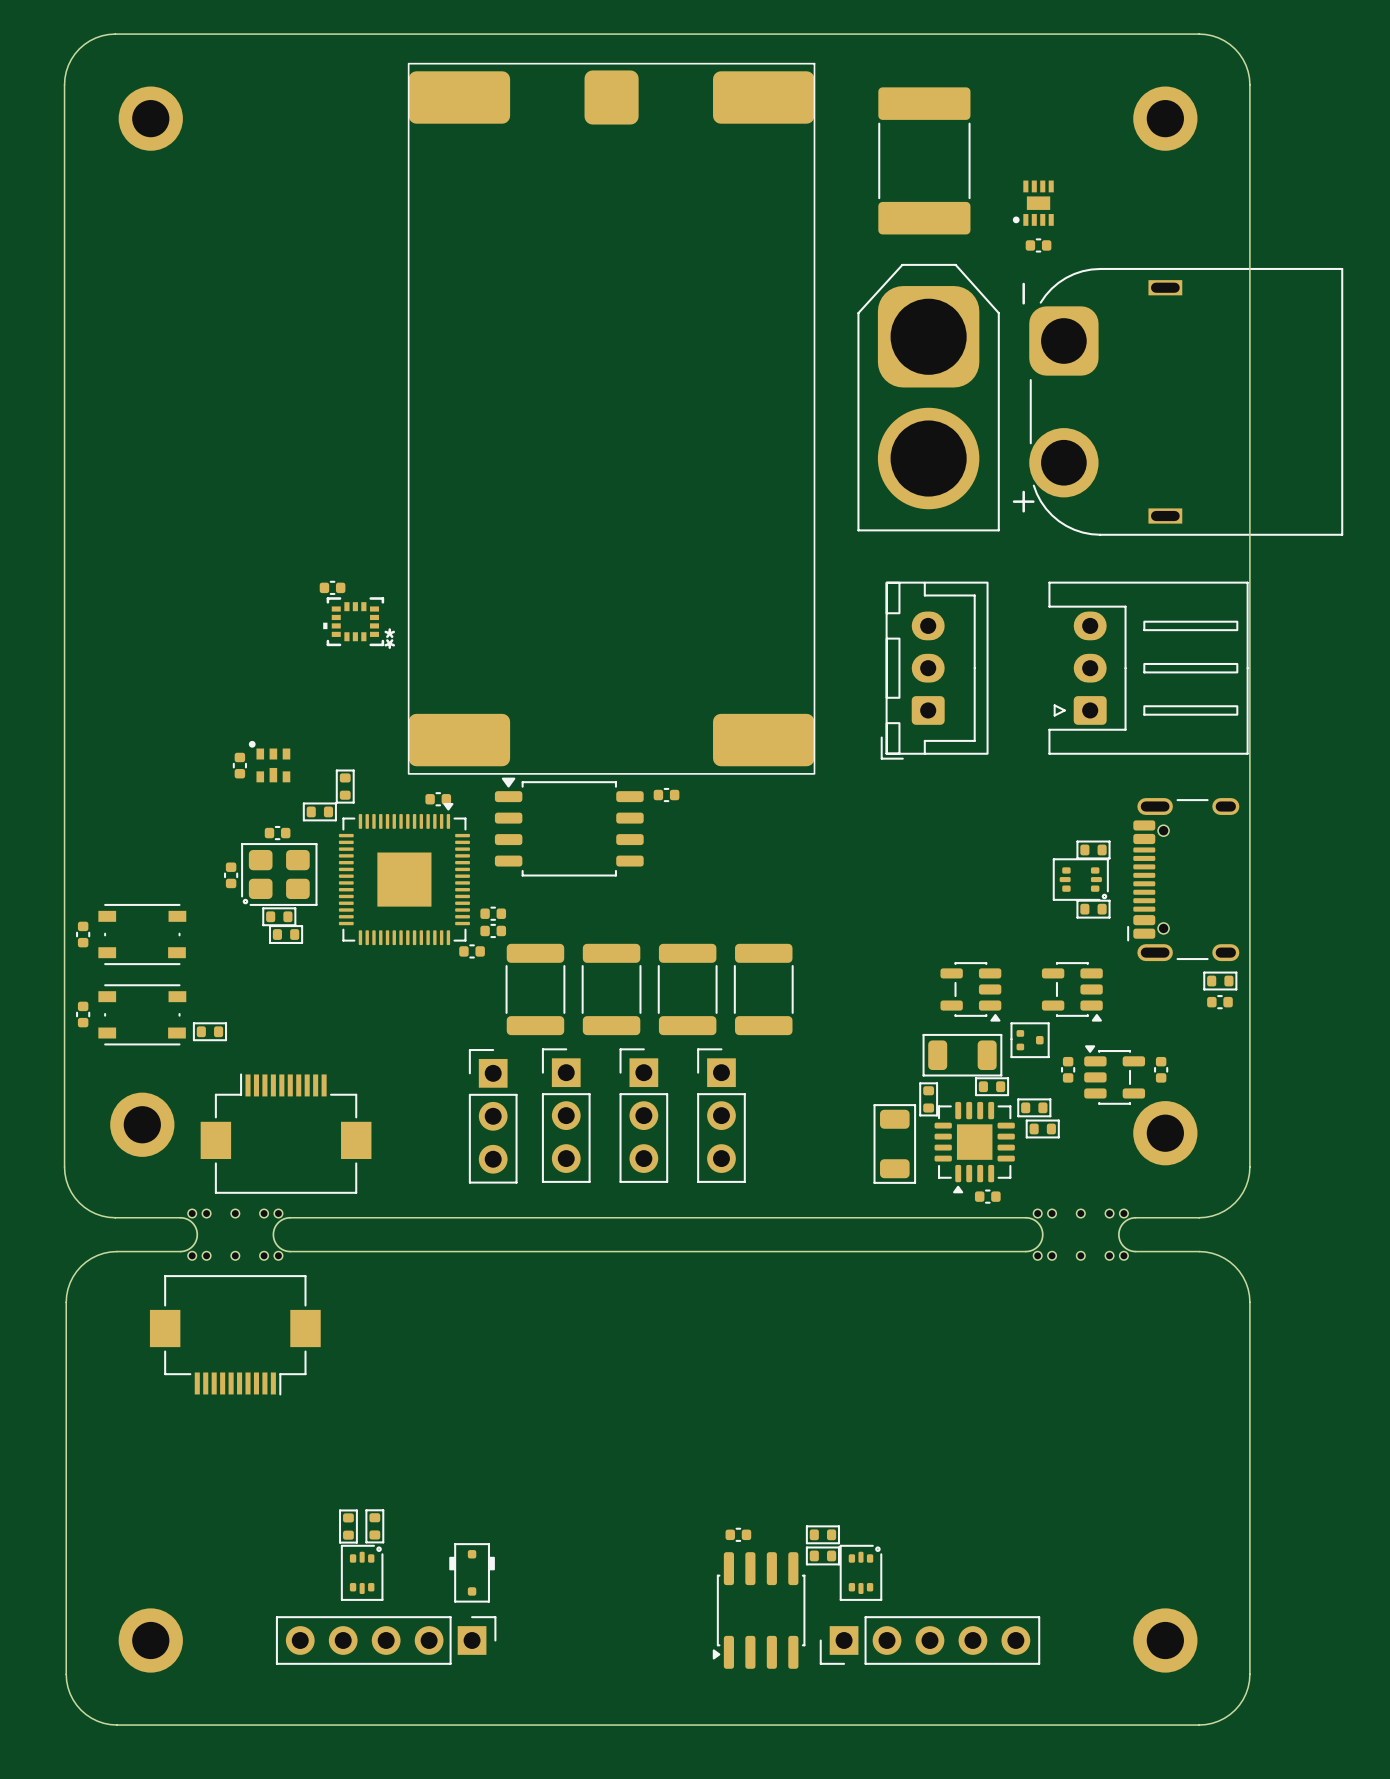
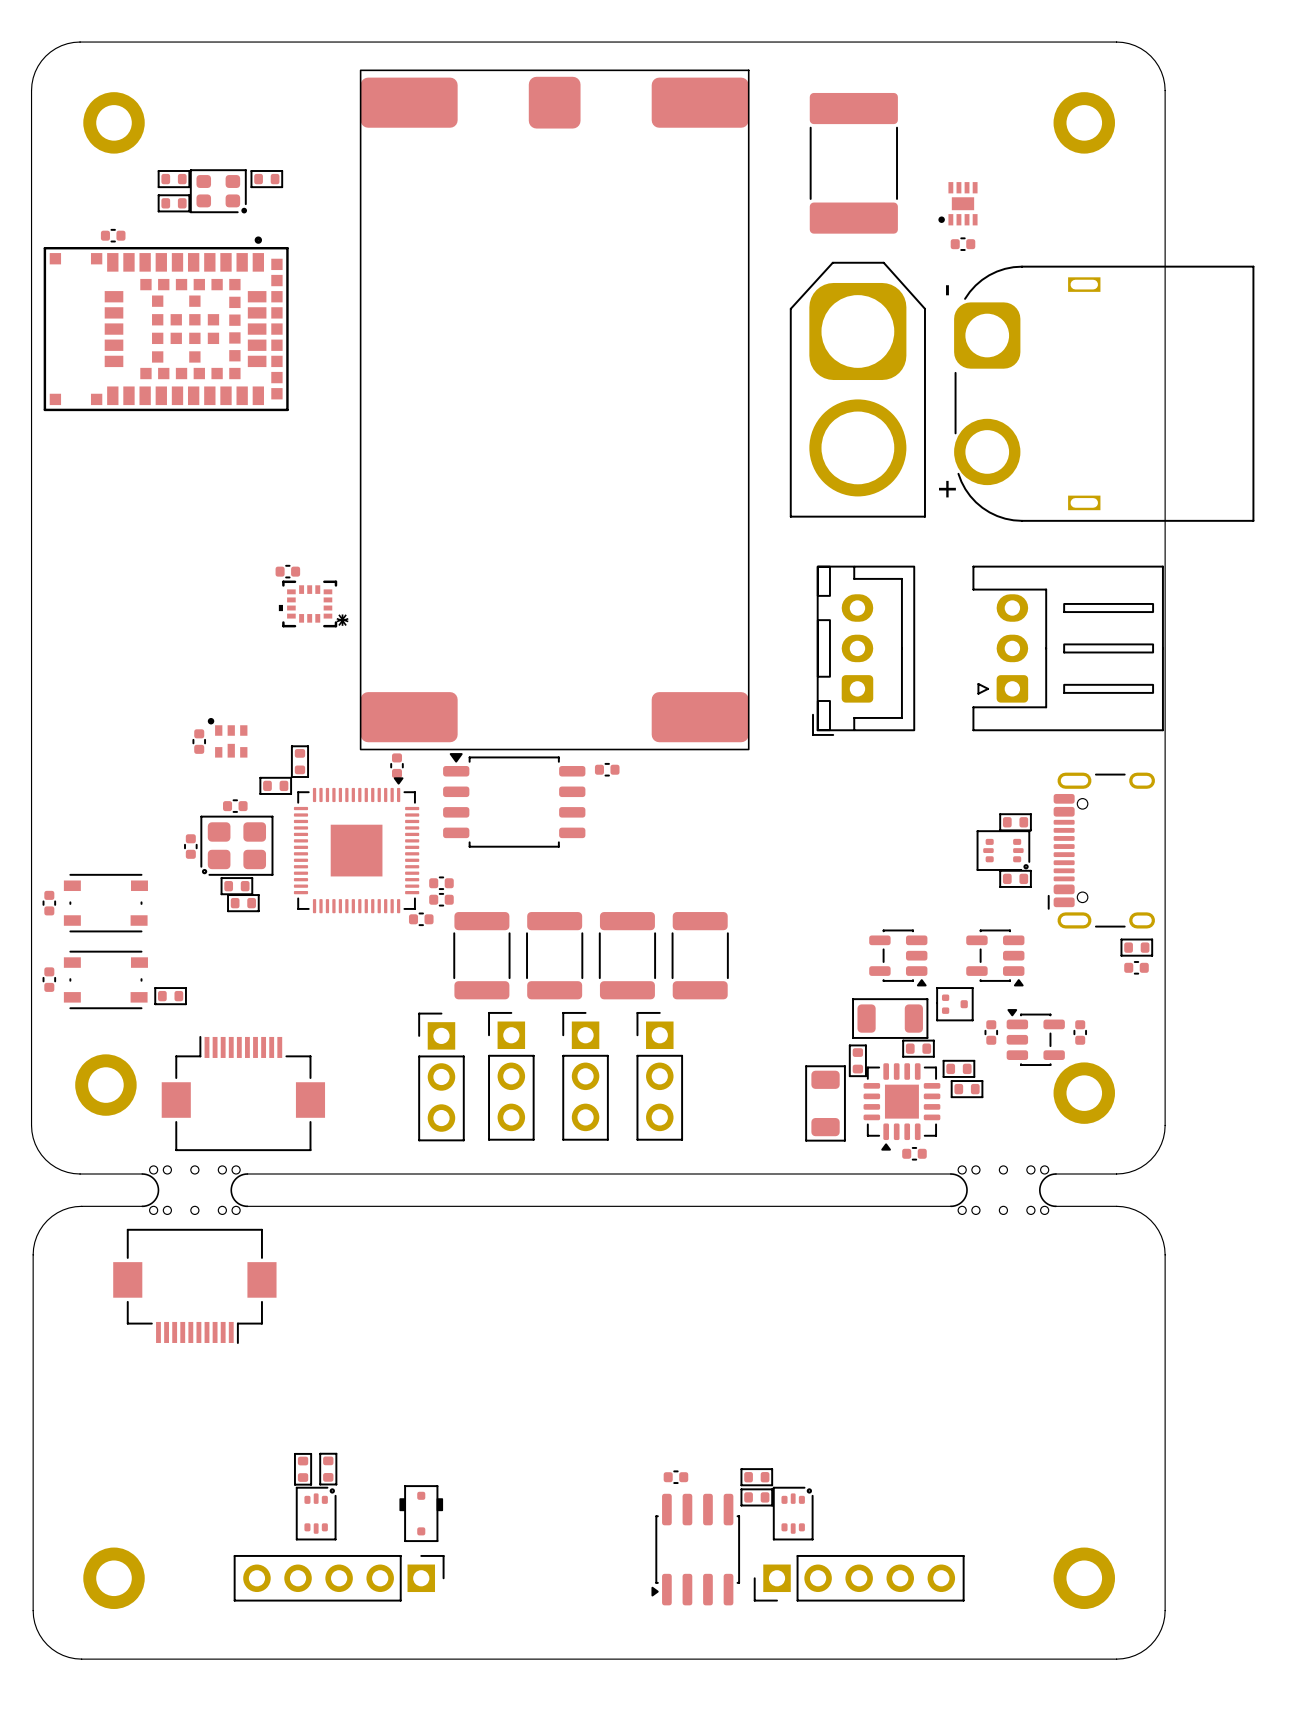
part: none -> (174, 179)
part: none -> (266, 179)
part: none -> (218, 191)
part: none -> (174, 203)
part: none -> (113, 235)
part: none -> (166, 323)
part rotation: 0° (438, 799) -> 90° clockwise (397, 765)

